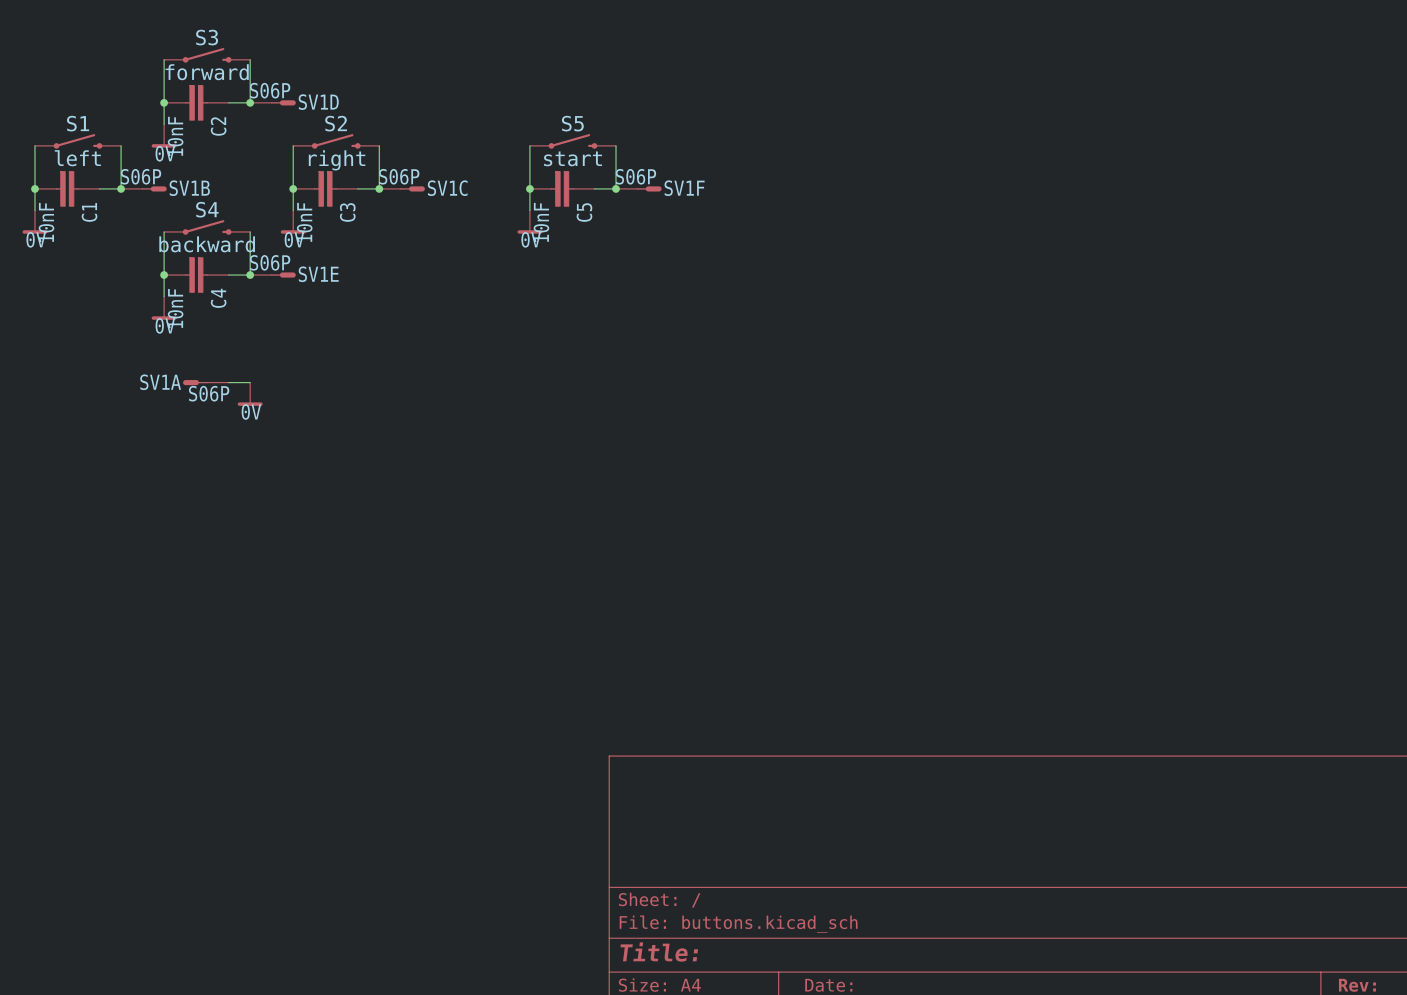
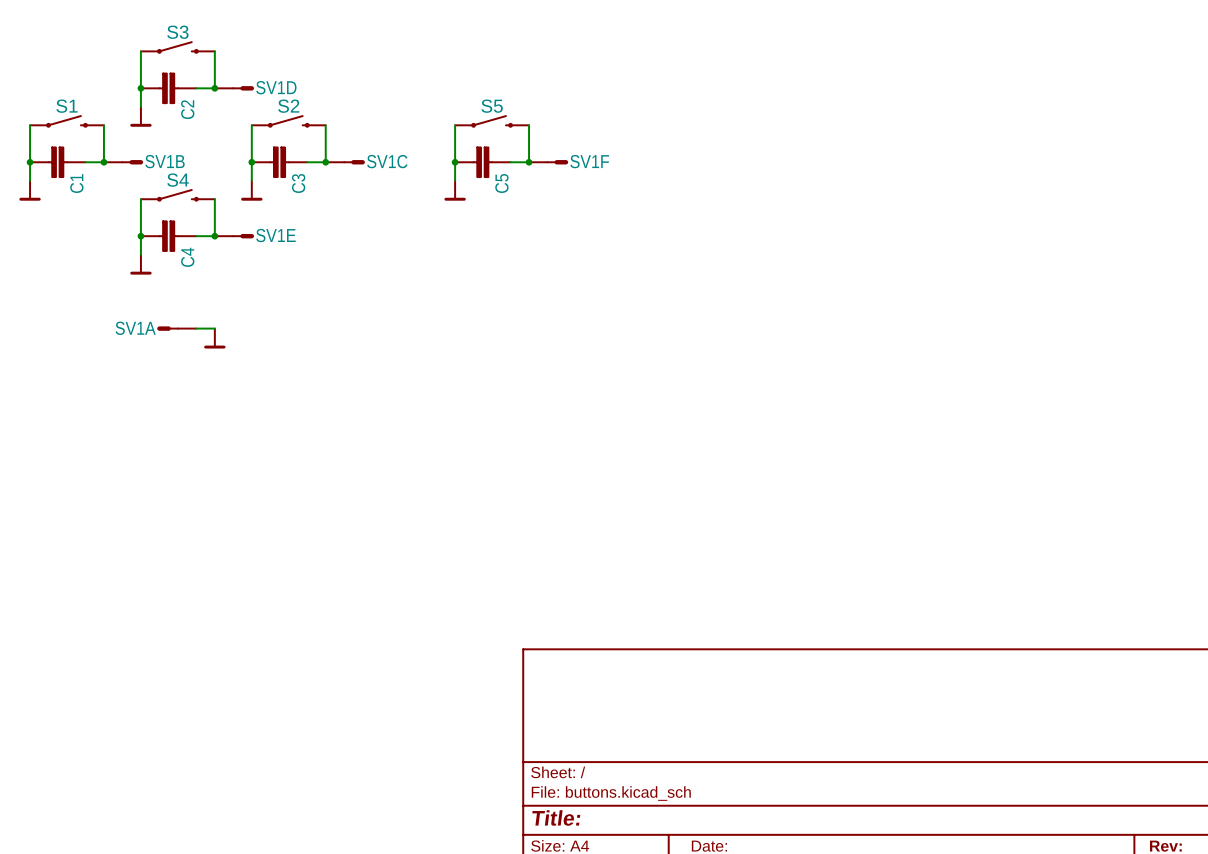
S3 value: forward (207, 72) -> none
SV1D value: S06P (270, 90) -> none
C2 value: 10nF (175, 136) -> none
power symbol text: 0V (165, 153) -> none
S1 value: left (77, 158) -> none
S5 value: start (573, 158) -> none
S2 value: right (337, 160) -> none
SV1B value: S06P (141, 176) -> none
SV1C value: S06P (399, 176) -> none
SV1F value: S06P (635, 176) -> none
C1 value: 10nF (46, 222) -> none
C3 value: 10nF (304, 222) -> none
C5 value: 10nF (541, 222) -> none
power symbol text: 0V (36, 239) -> none
power symbol text: 0V (294, 239) -> none
power symbol text: 0V (531, 239) -> none
S4 value: backward (207, 244) -> none
SV1E value: S06P (270, 262) -> none
C4 value: 10nF (175, 308) -> none
power symbol text: 0V (165, 325) -> none
SV1A value: S06P (209, 393) -> none
power symbol text: 0V (251, 411) -> none

